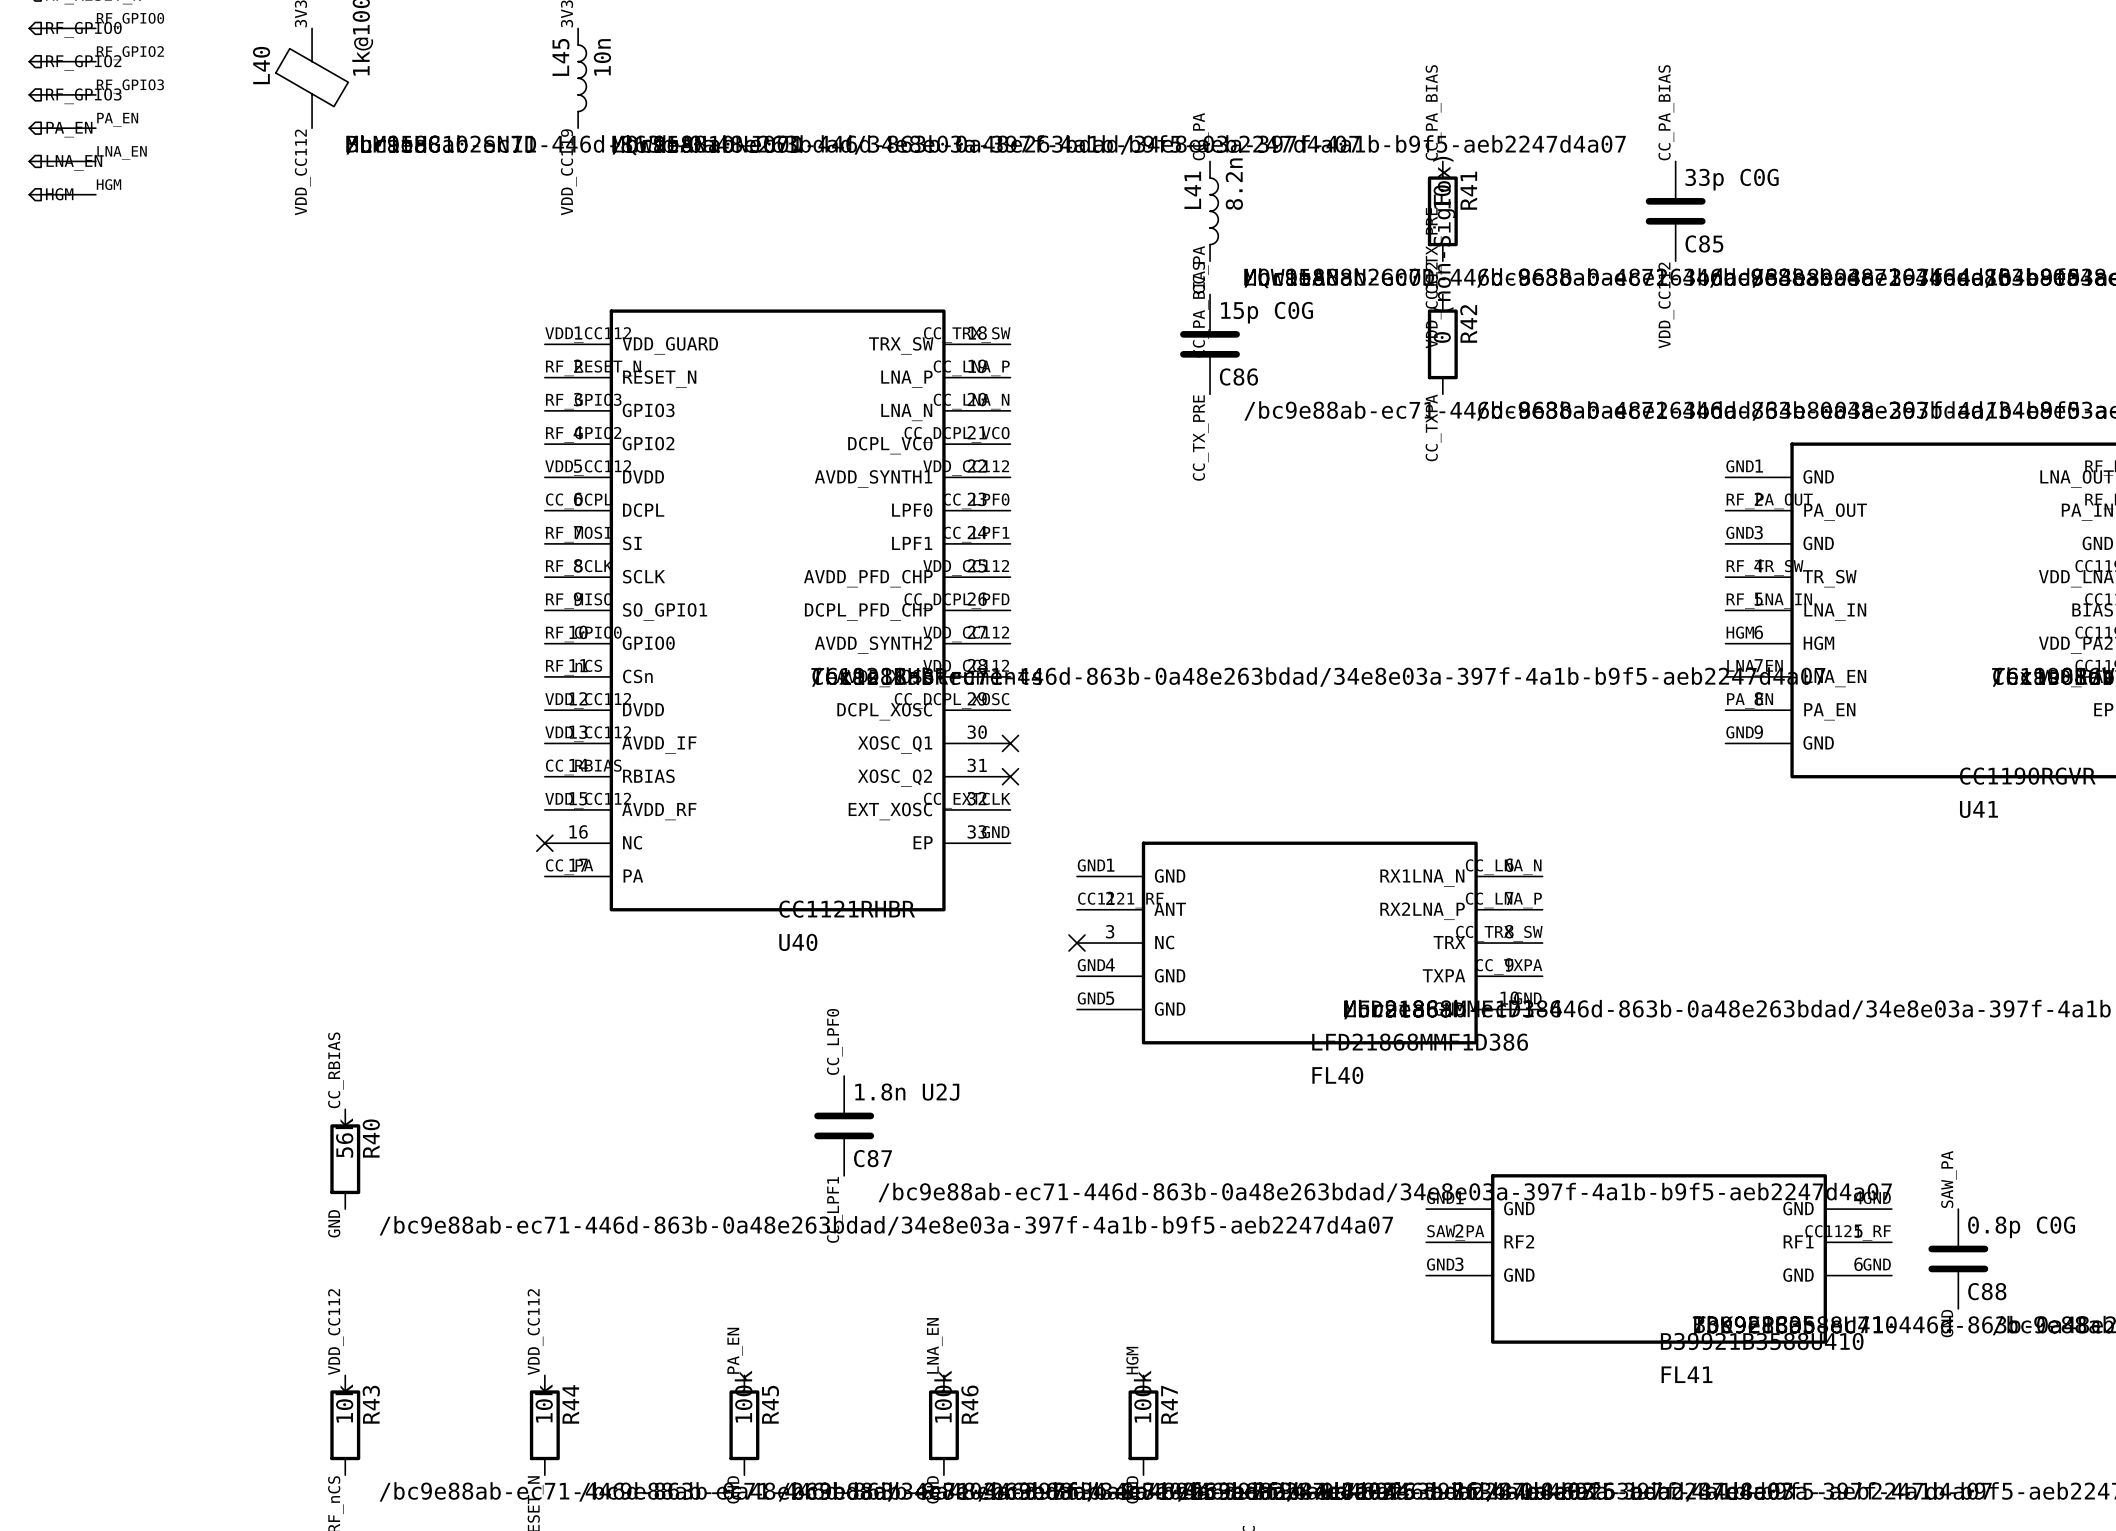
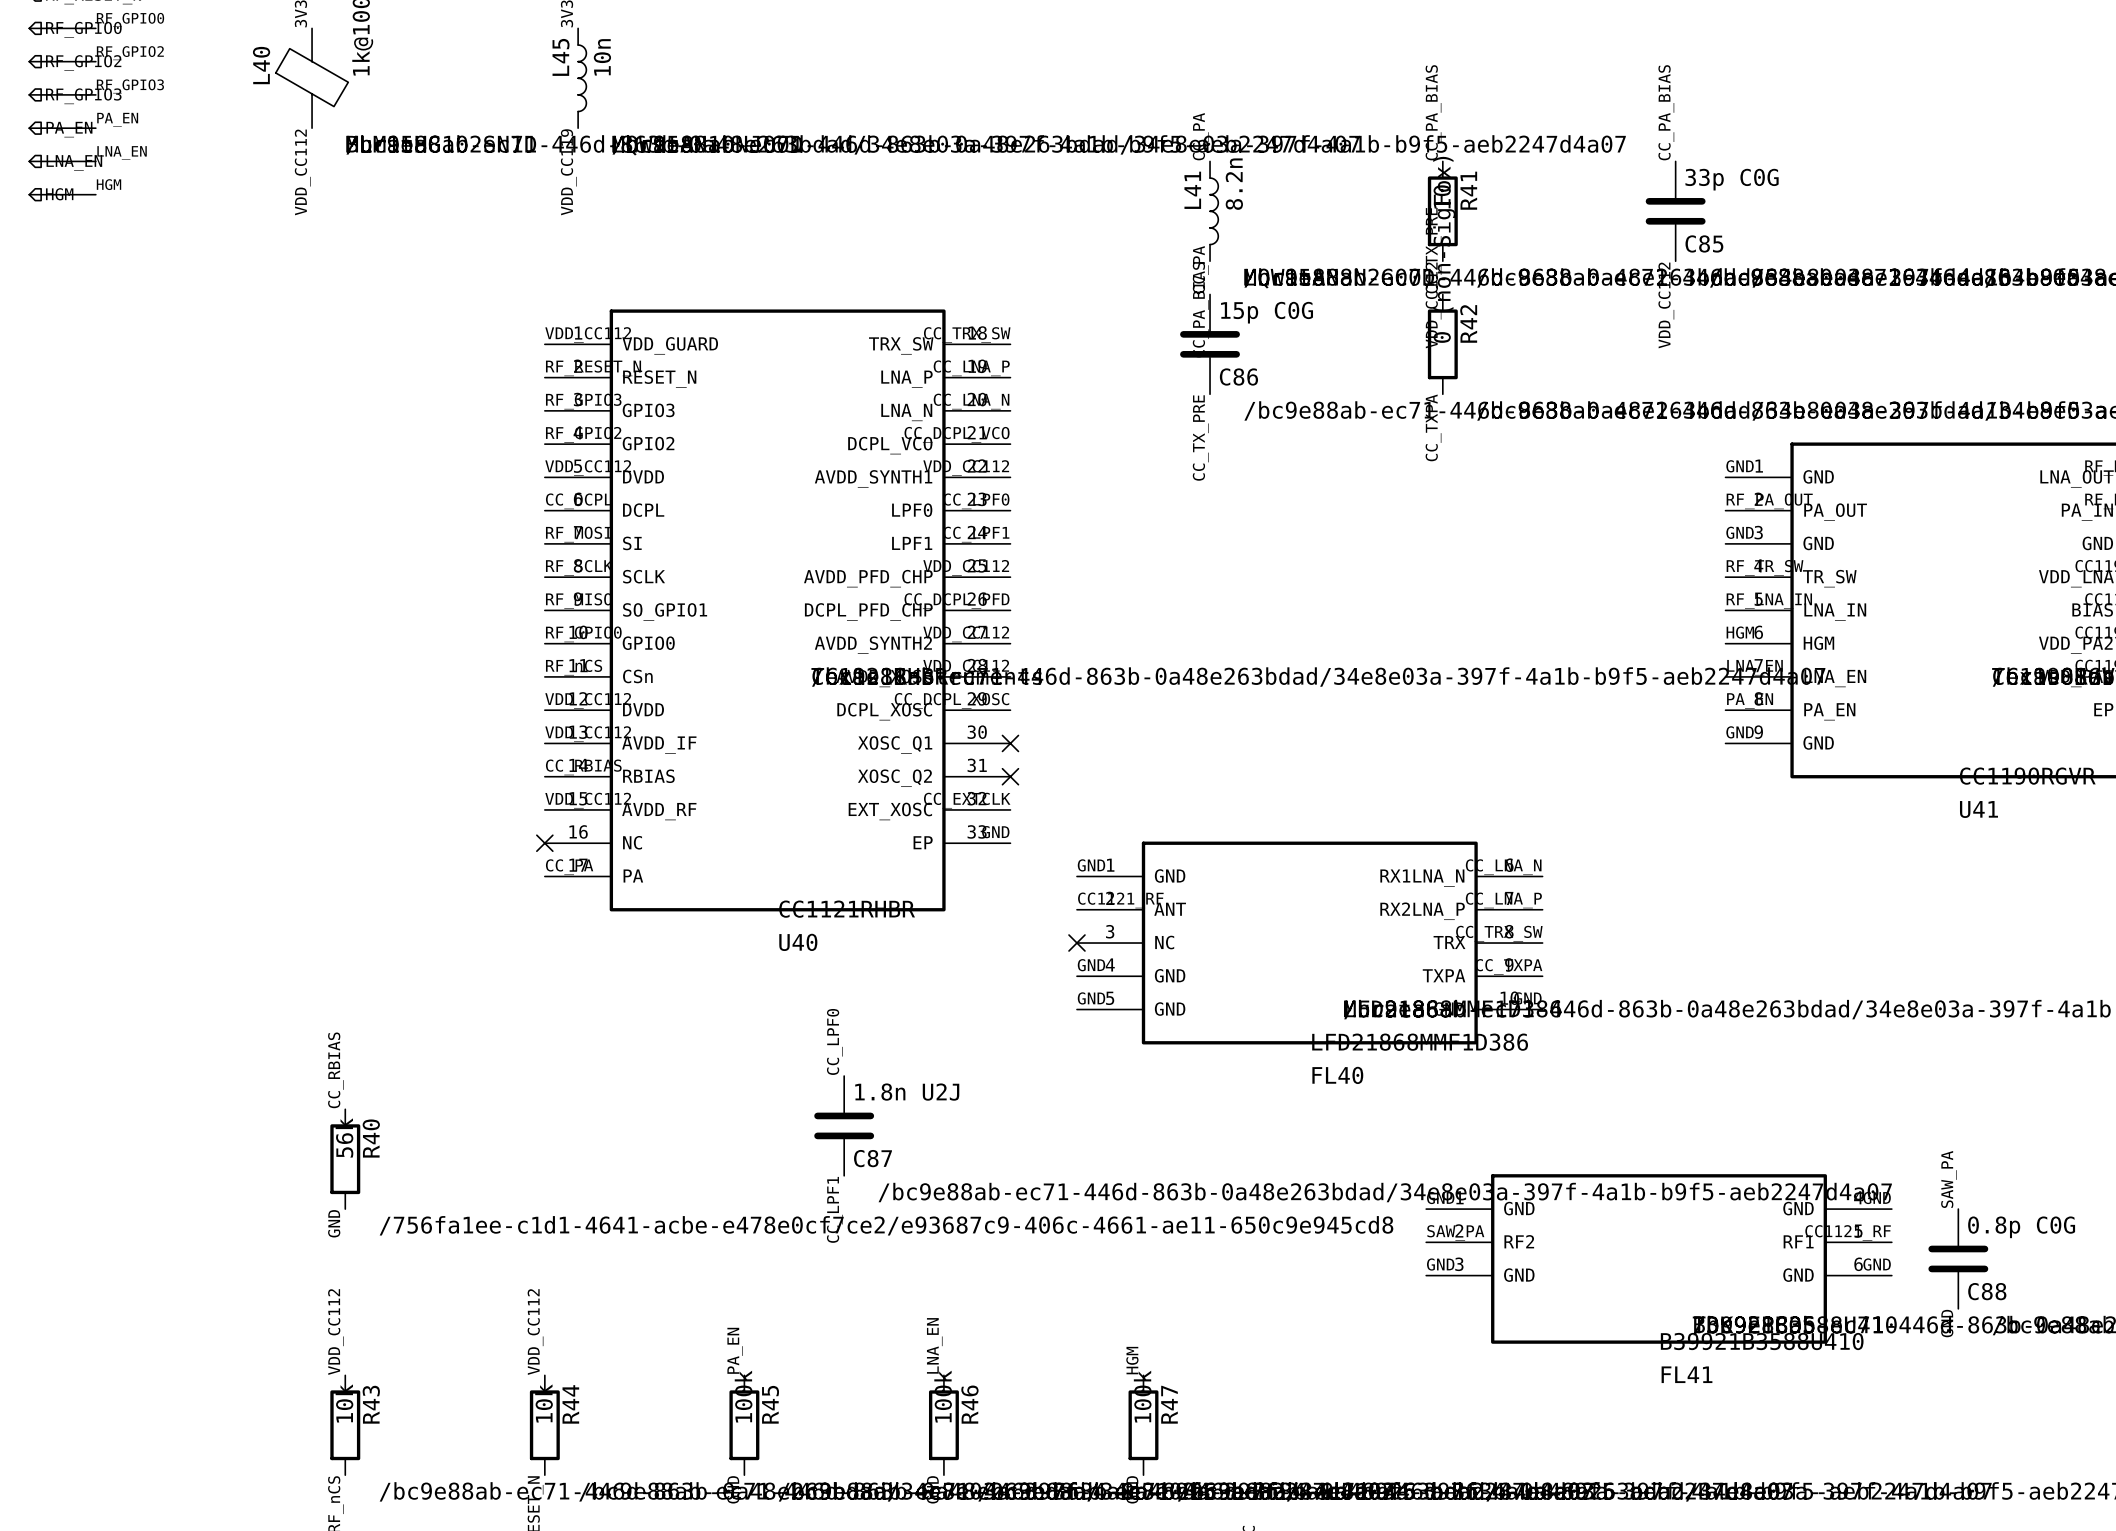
R40 text: /bc9e88ab-ec71-446d-863b-0a48e263bdad/34e8e03a-397f-4a1b-b9f5-aeb2247d4a07 (886, 1225) -> /756fa1ee-c1d1-4641-acbe-e478e0cf7ce2/e93687c9-406c-4661-ae11-650c9e945cd8 (886, 1225)

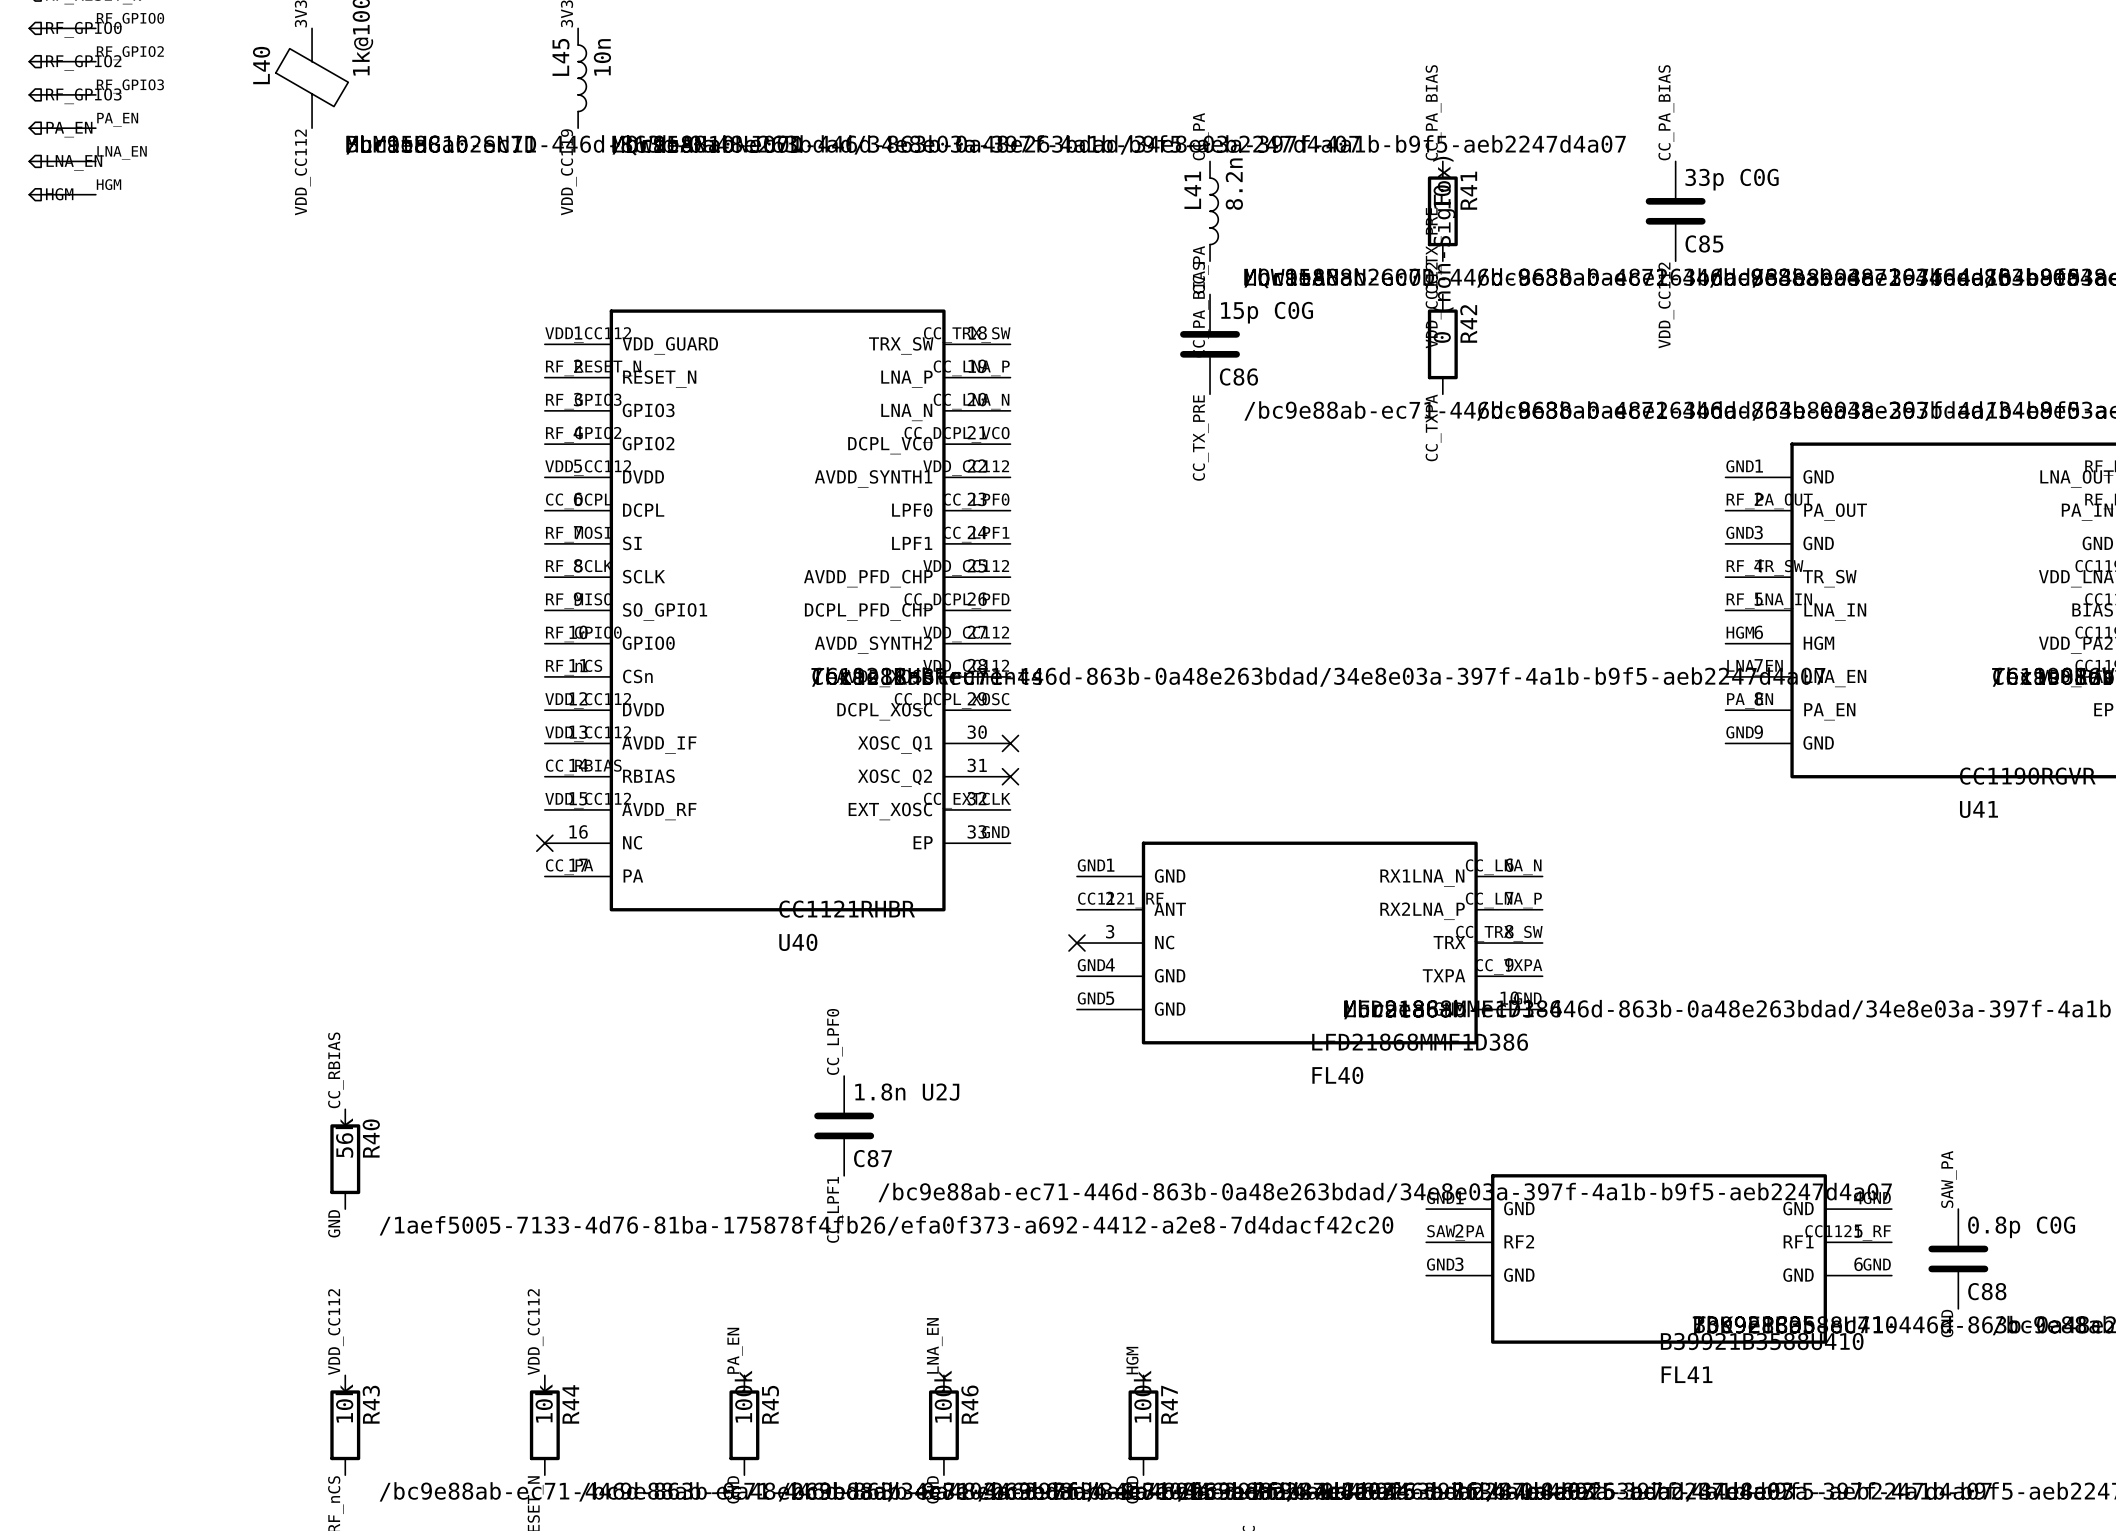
R40 text: /756fa1ee-c1d1-4641-acbe-e478e0cf7ce2/e93687c9-406c-4661-ae11-650c9e945cd8 (886, 1225) -> /1aef5005-7133-4d76-81ba-175878f4fb26/efa0f373-a692-4412-a2e8-7d4dacf42c20 (886, 1225)

